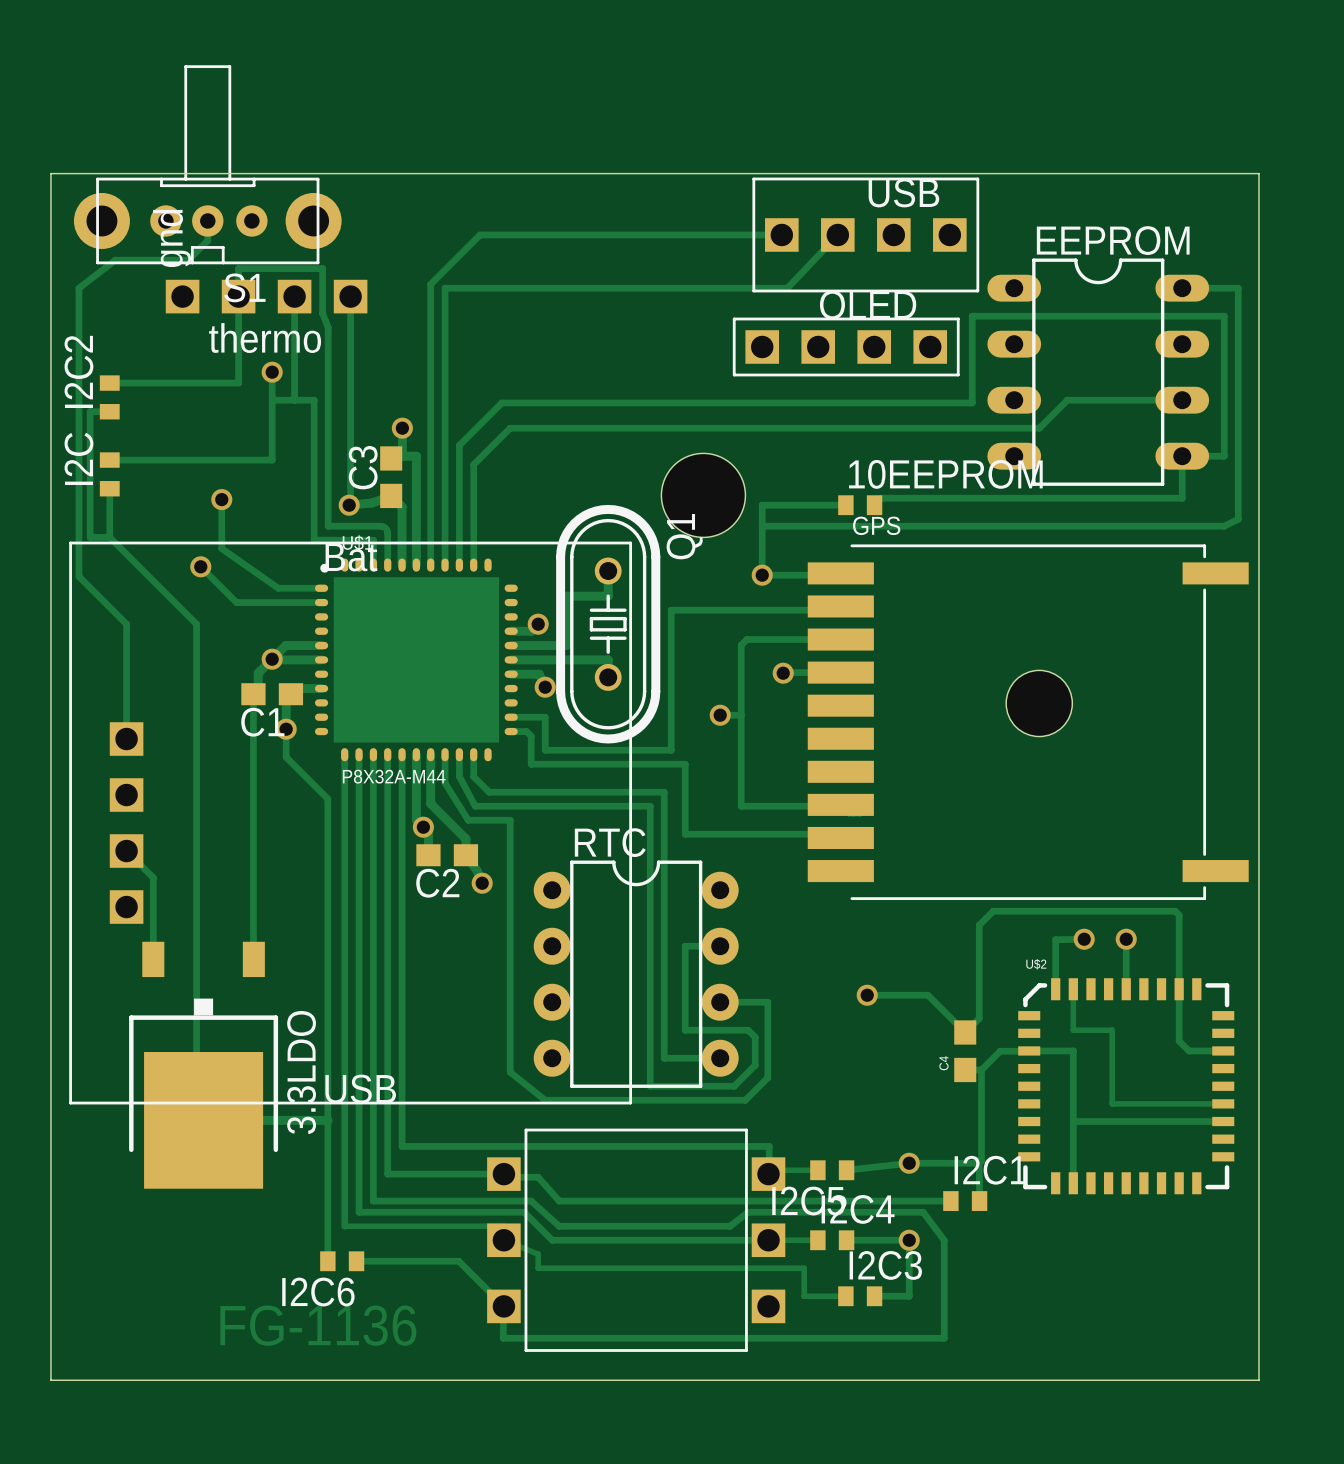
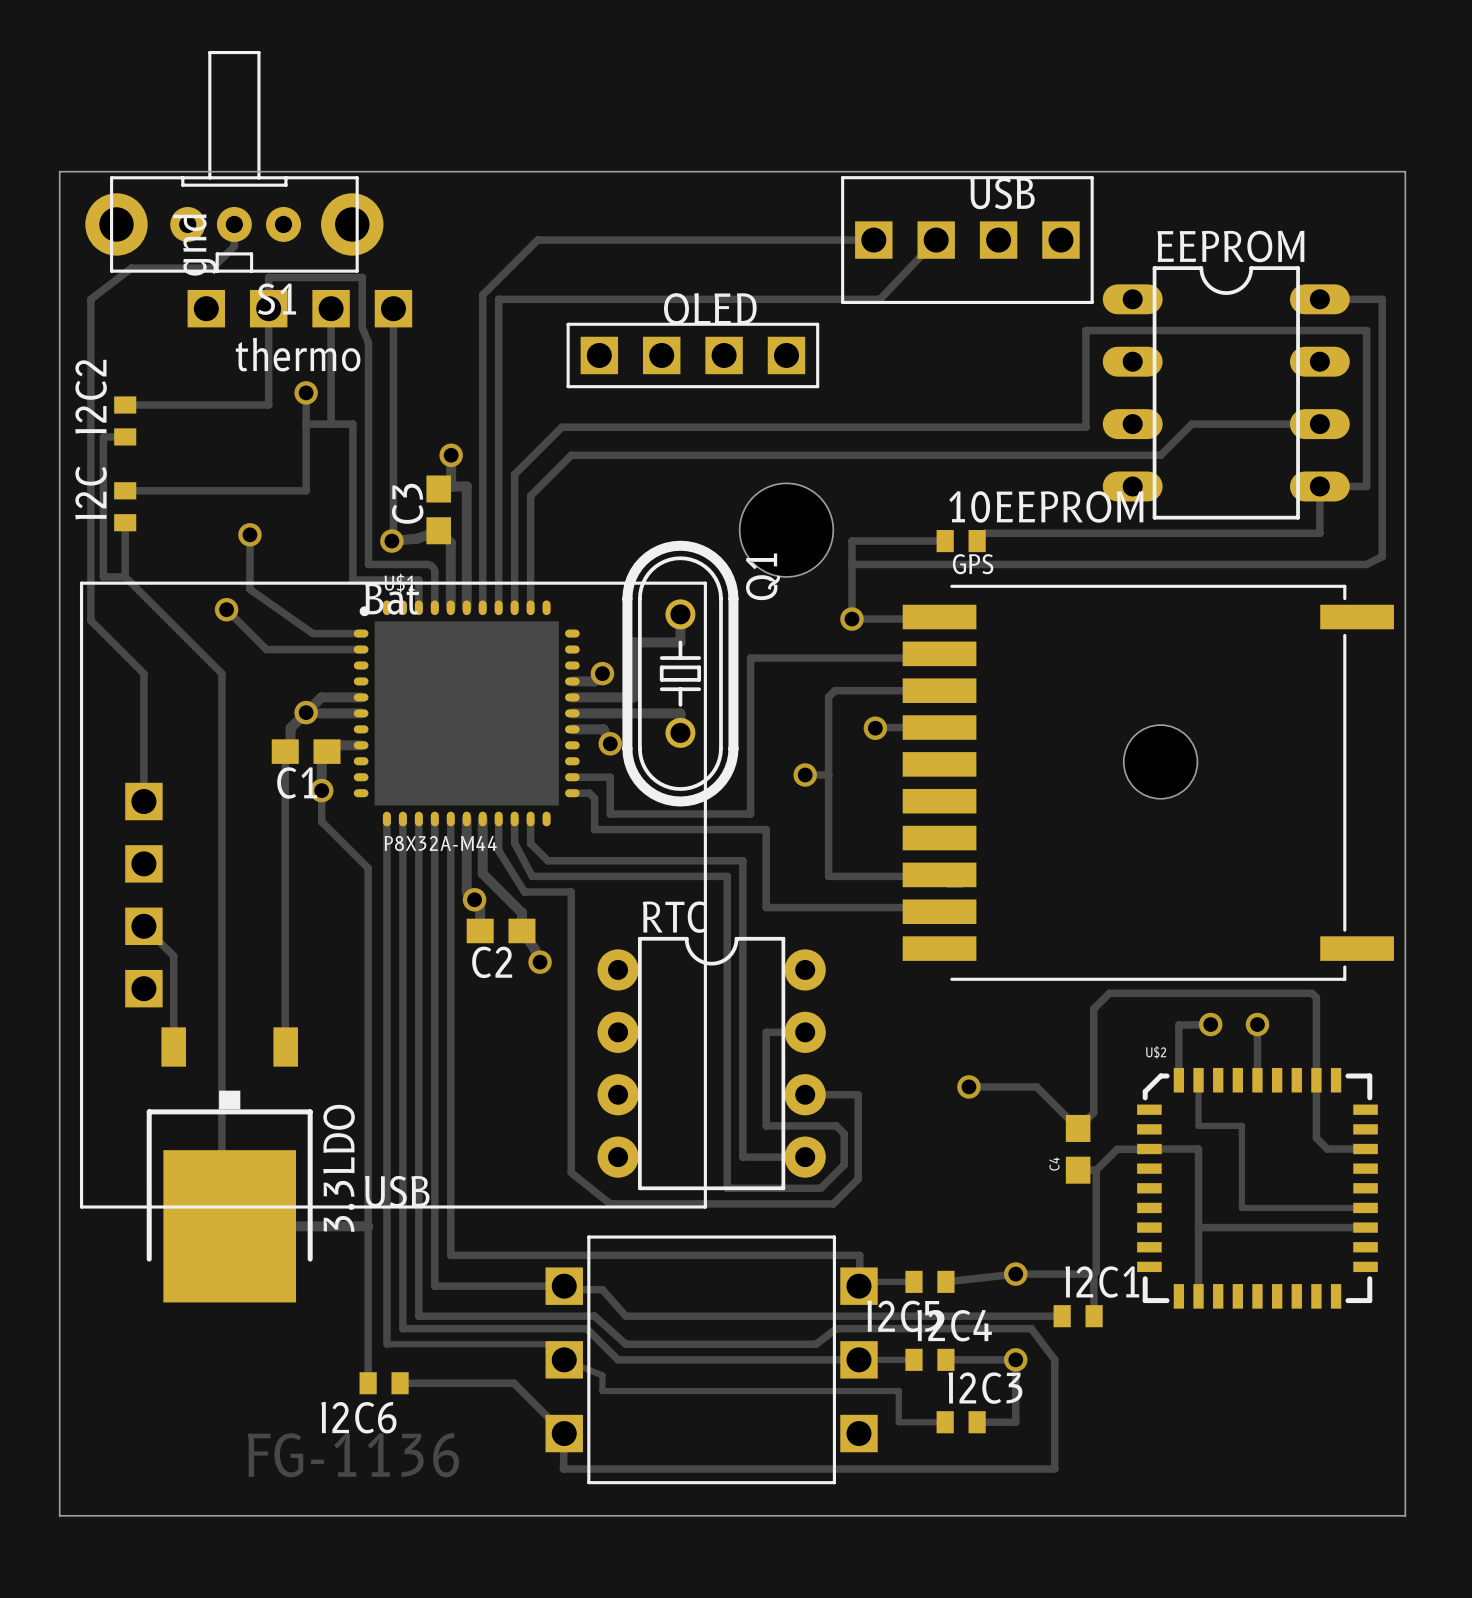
part position: (846, 346) -> (692, 355)

